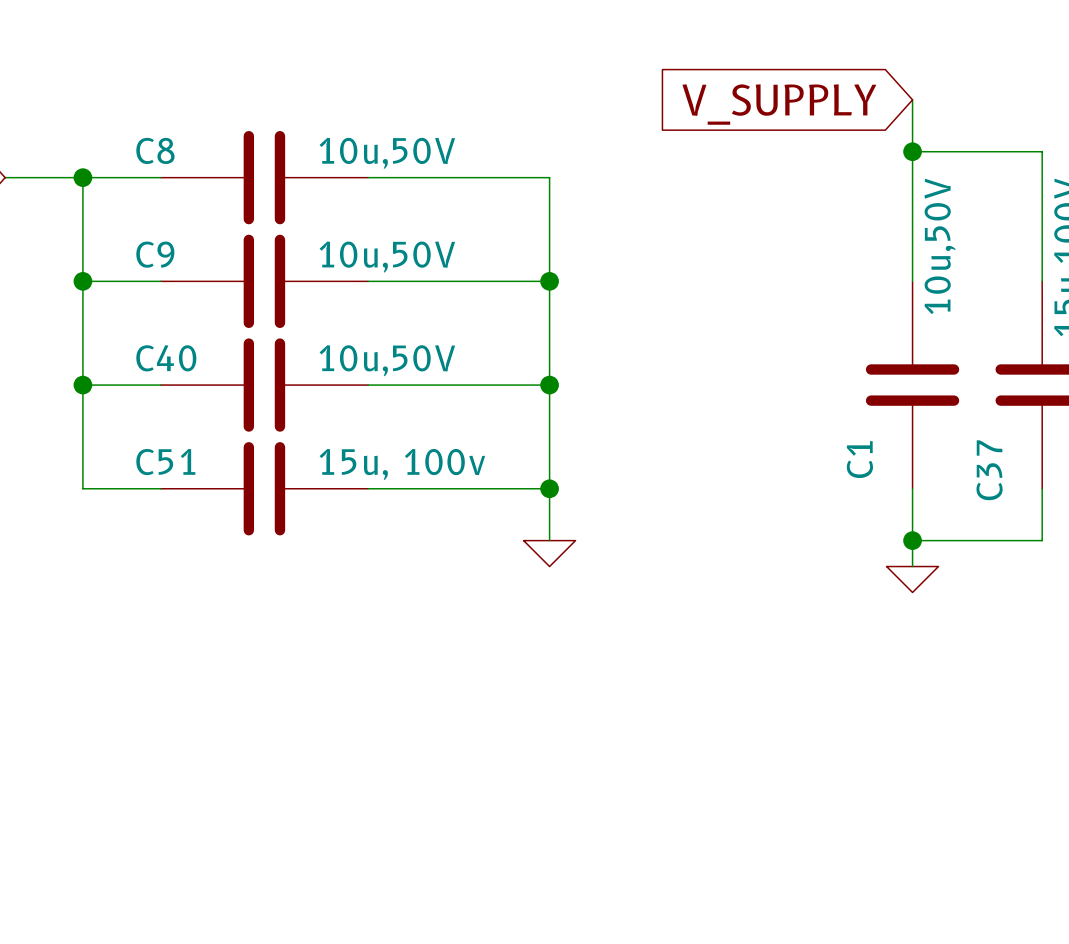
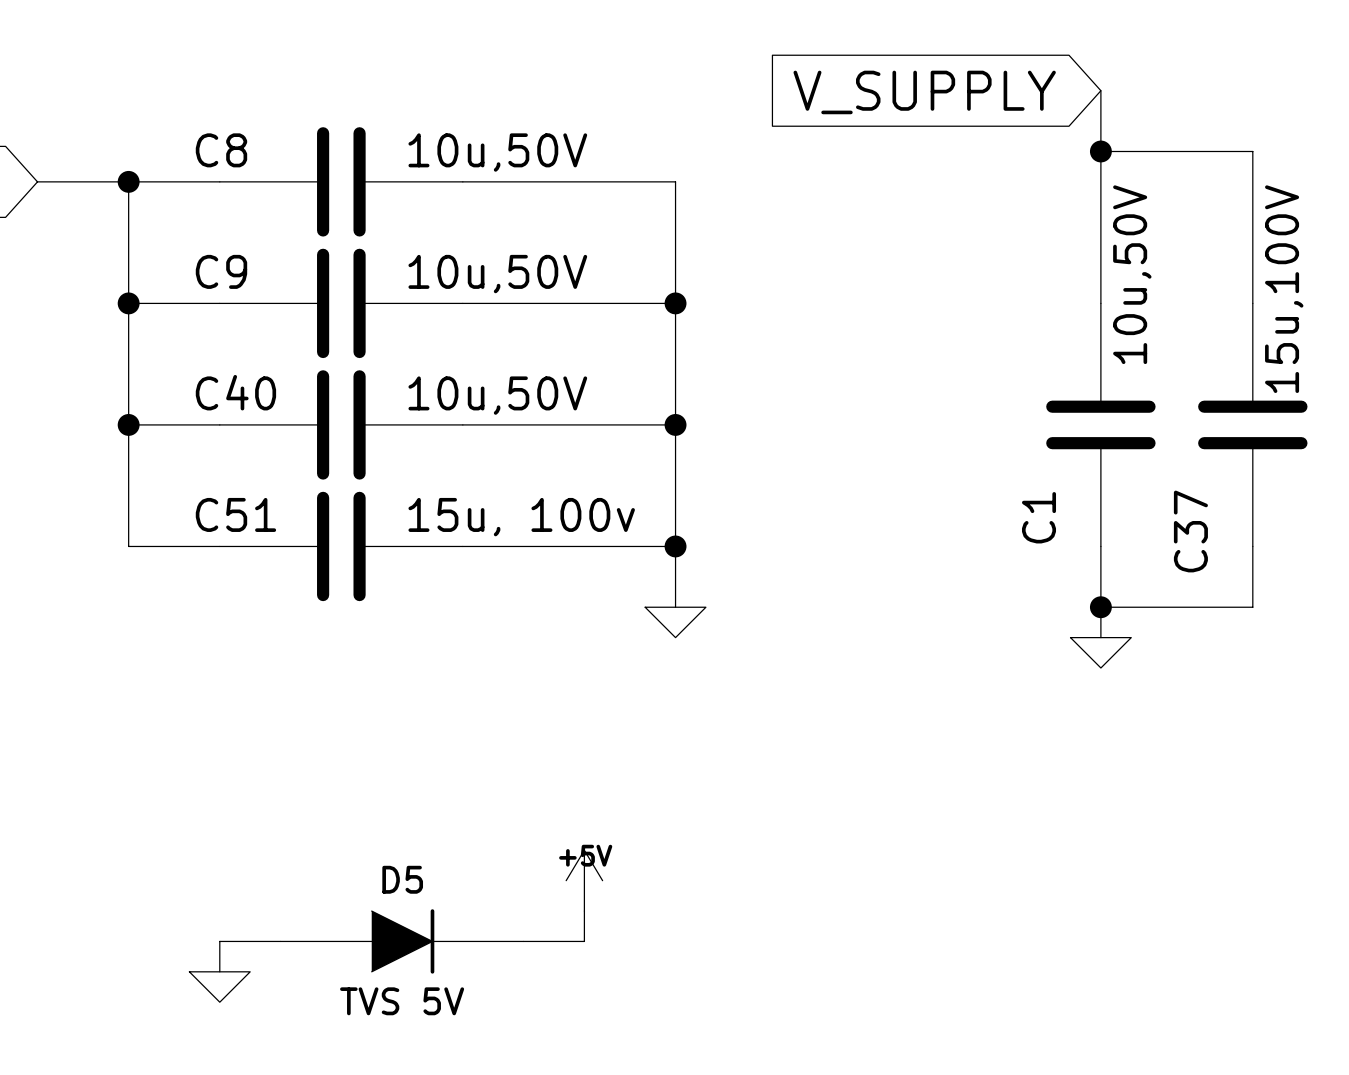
power symbol: none -> +5V (584, 880)
wire: none -> (584, 911) (584, 941) (523, 941)
wire: none -> (280, 941) (219, 941) (219, 971)
D5: none -> TVS 5V (402, 941)
power symbol: none -> (219, 987)

